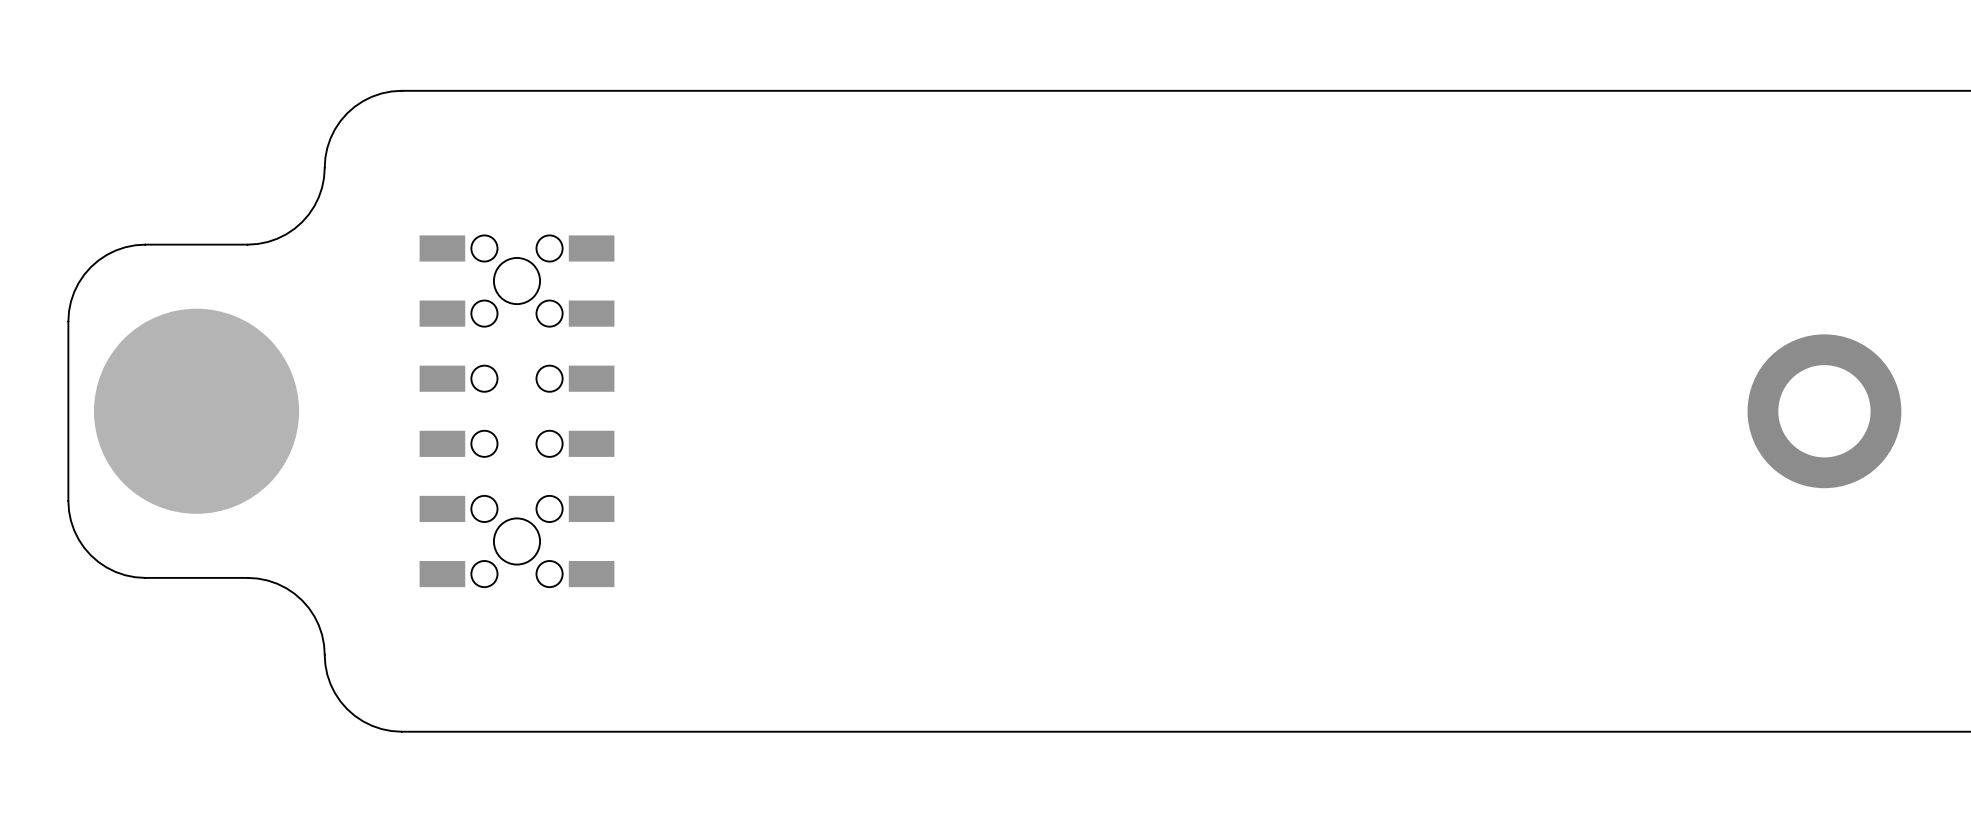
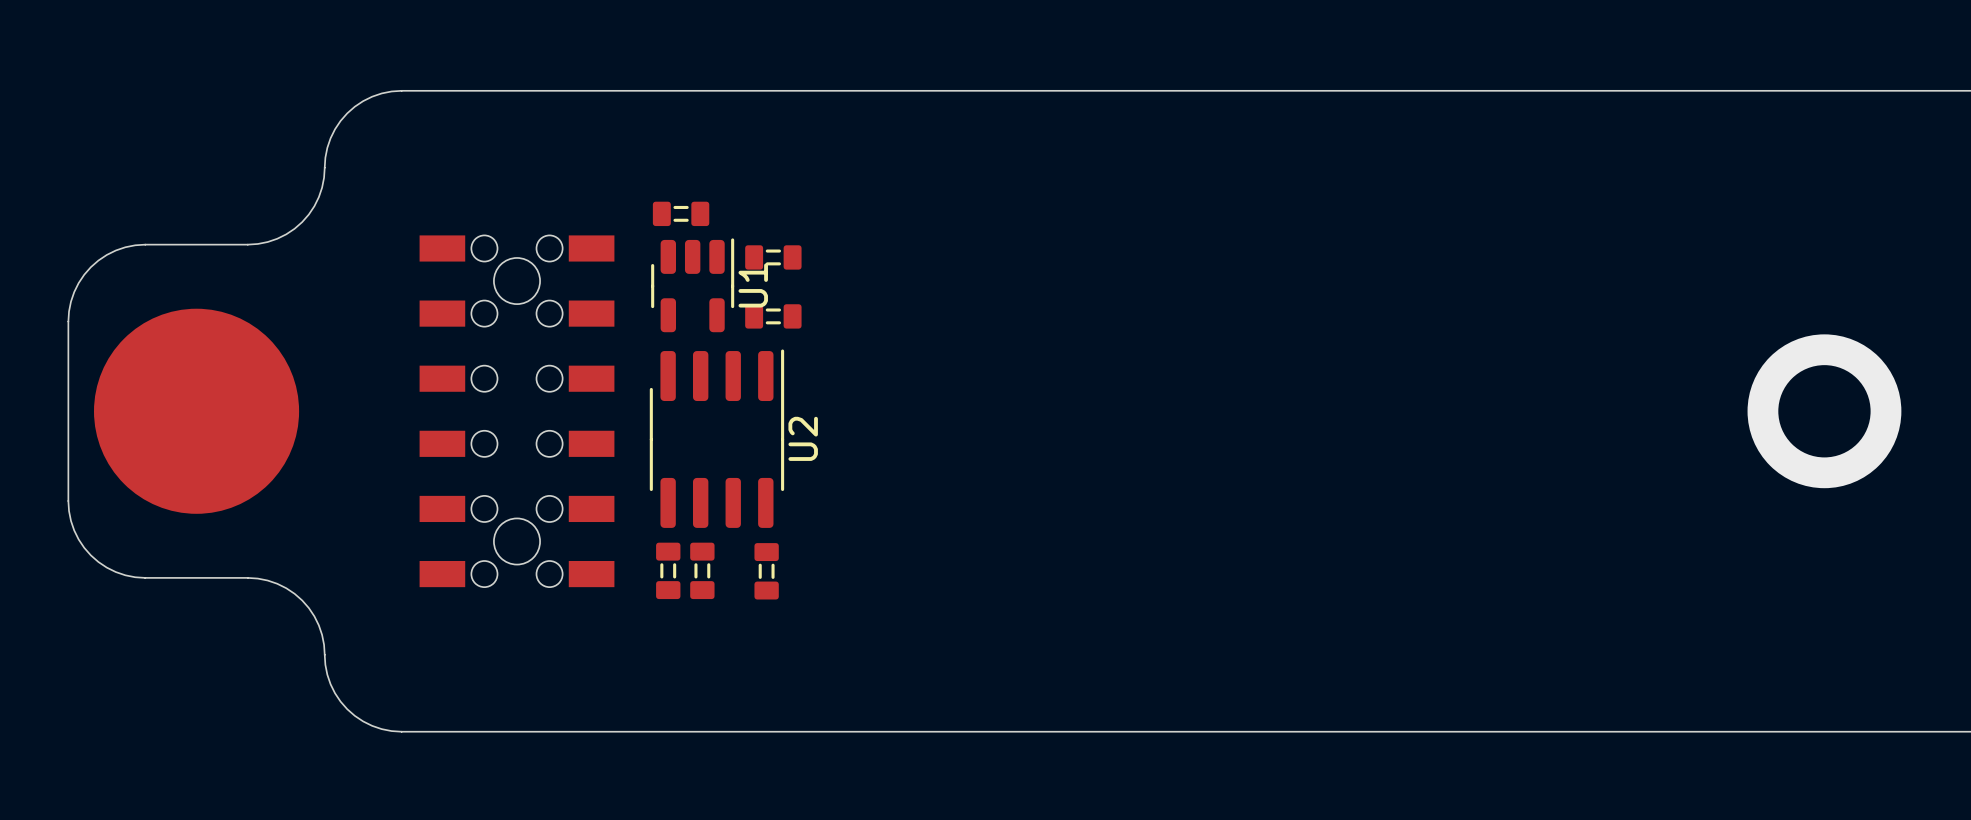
part: none -> (681, 213)
part: none -> (773, 257)
U1: none -> (692, 285)
part: none -> (773, 316)
U2: none -> (716, 438)
part: none -> (668, 570)
part: none -> (702, 570)
part: none -> (766, 571)

